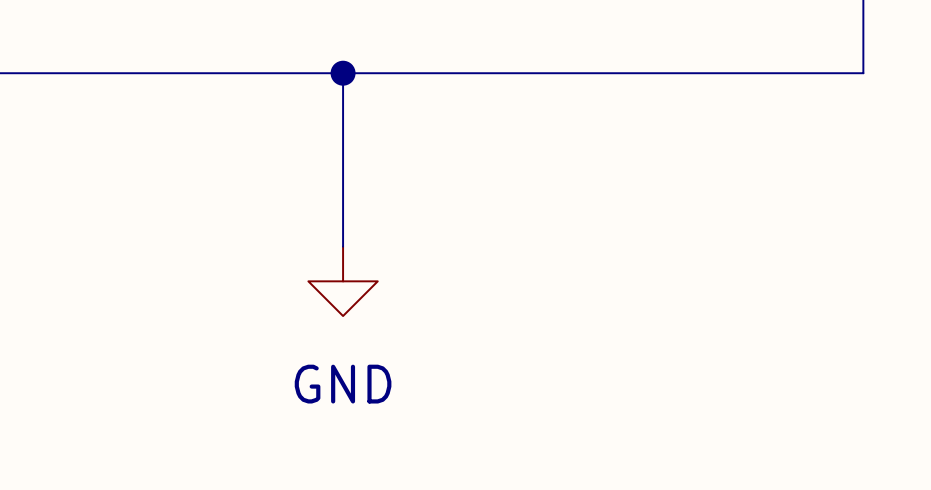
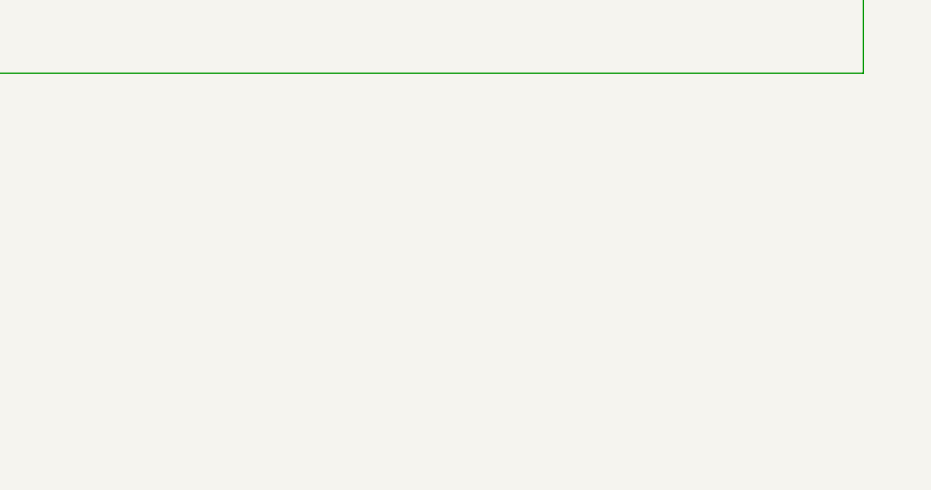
wire: (343, 73) (343, 246) -> none
junction: (343, 73) -> none
power symbol: GND (343, 281) -> none

